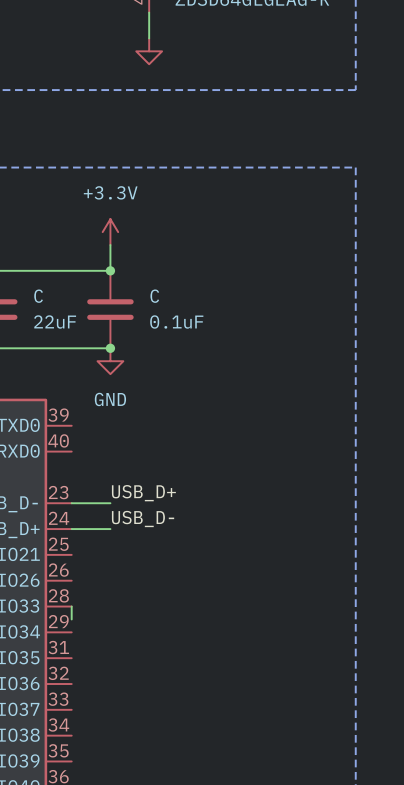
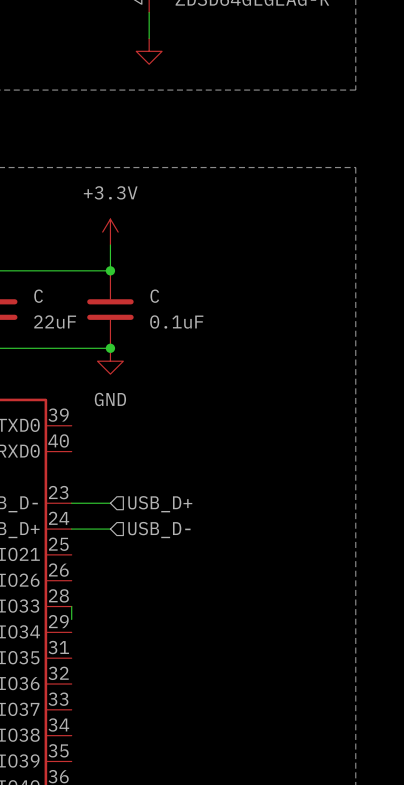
label: USB_D+ (143, 493) -> none
hierarchical label: none -> USB_D+ (160, 504)
label: USB_D- (143, 518) -> none
hierarchical label: none -> USB_D- (159, 530)

